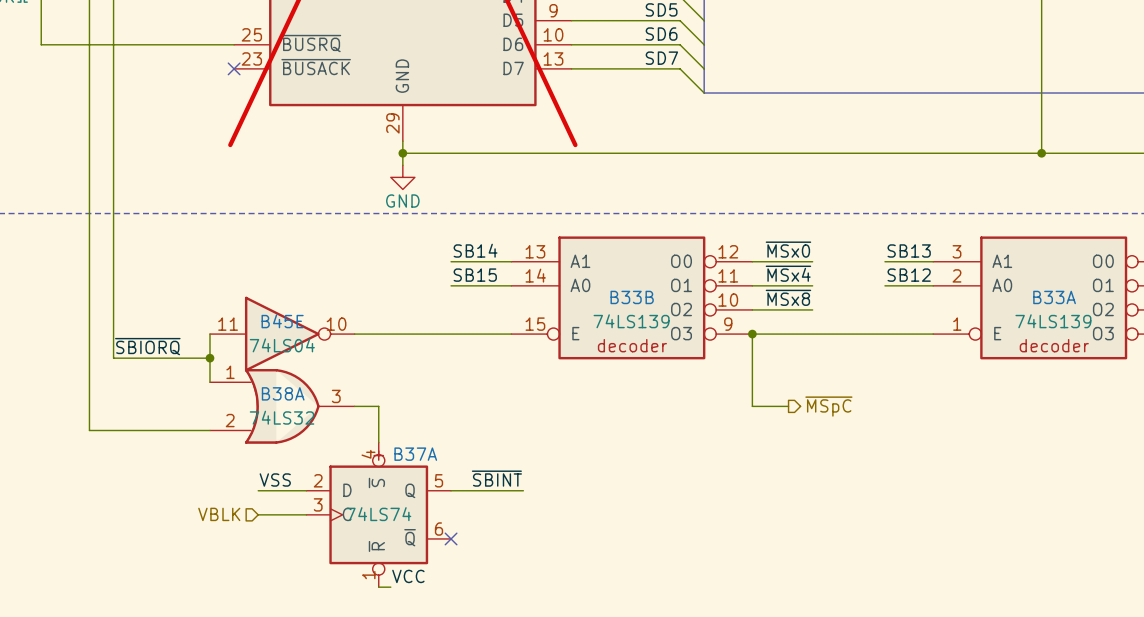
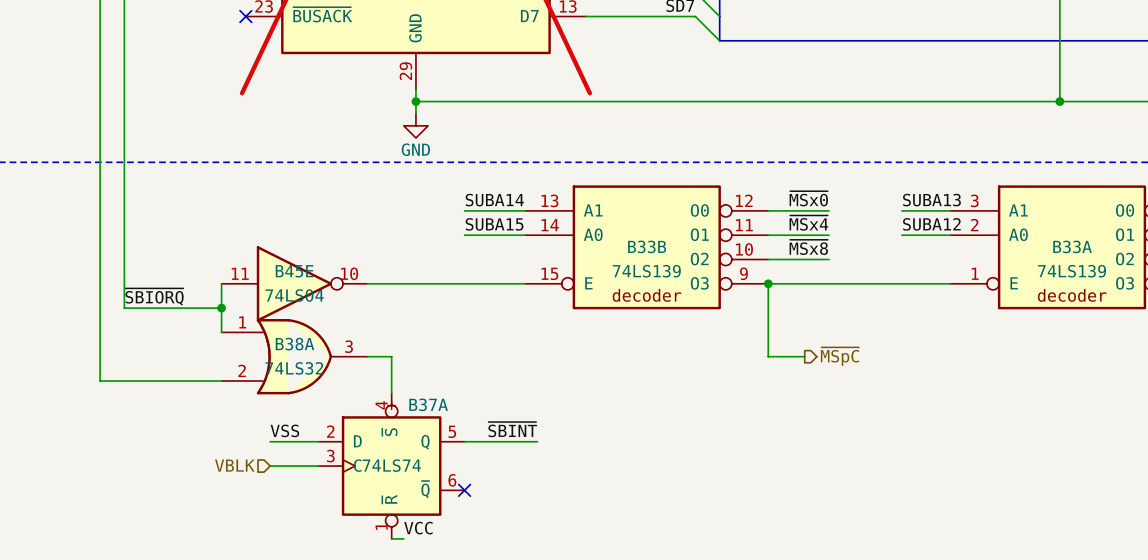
label: SB14 (475, 250) -> SUBA14 (494, 200)
label: SB13 (909, 250) -> SUBA13 (931, 200)
label: SB15 (475, 275) -> SUBA15 (494, 224)
label: SB12 (909, 275) -> SUBA12 (931, 224)

